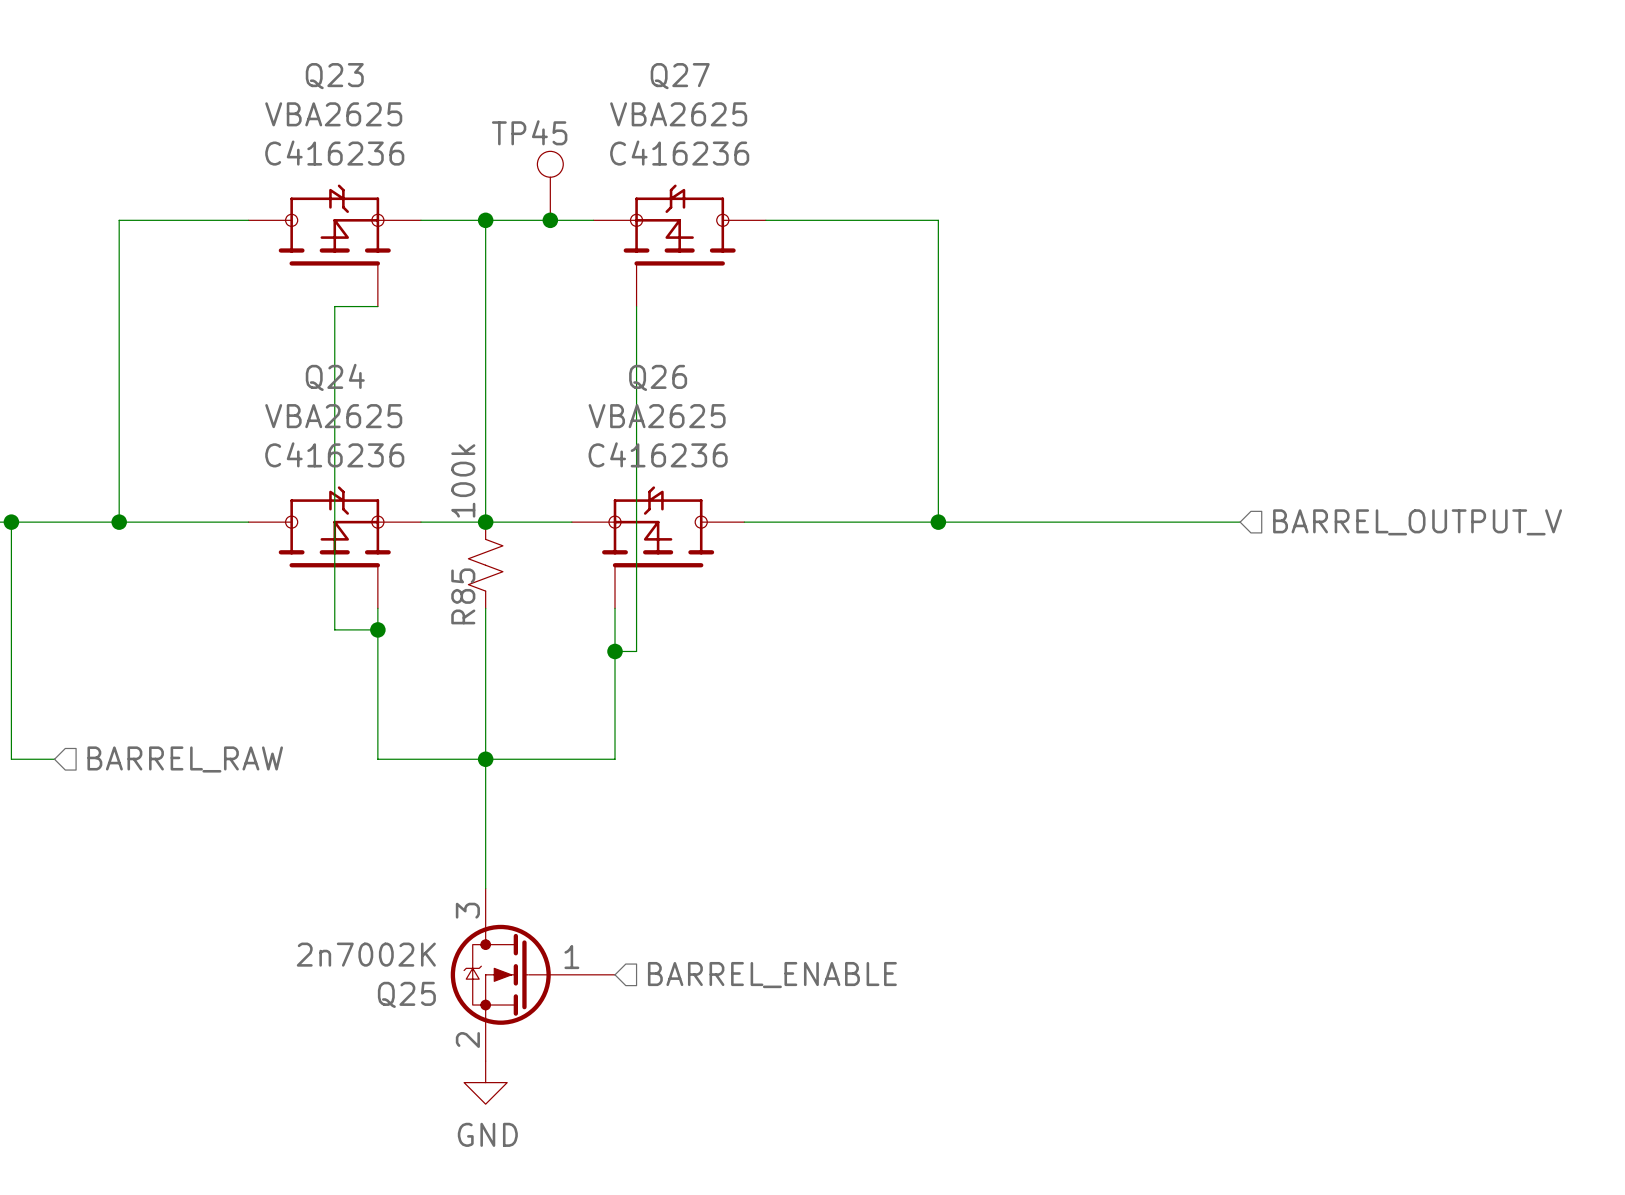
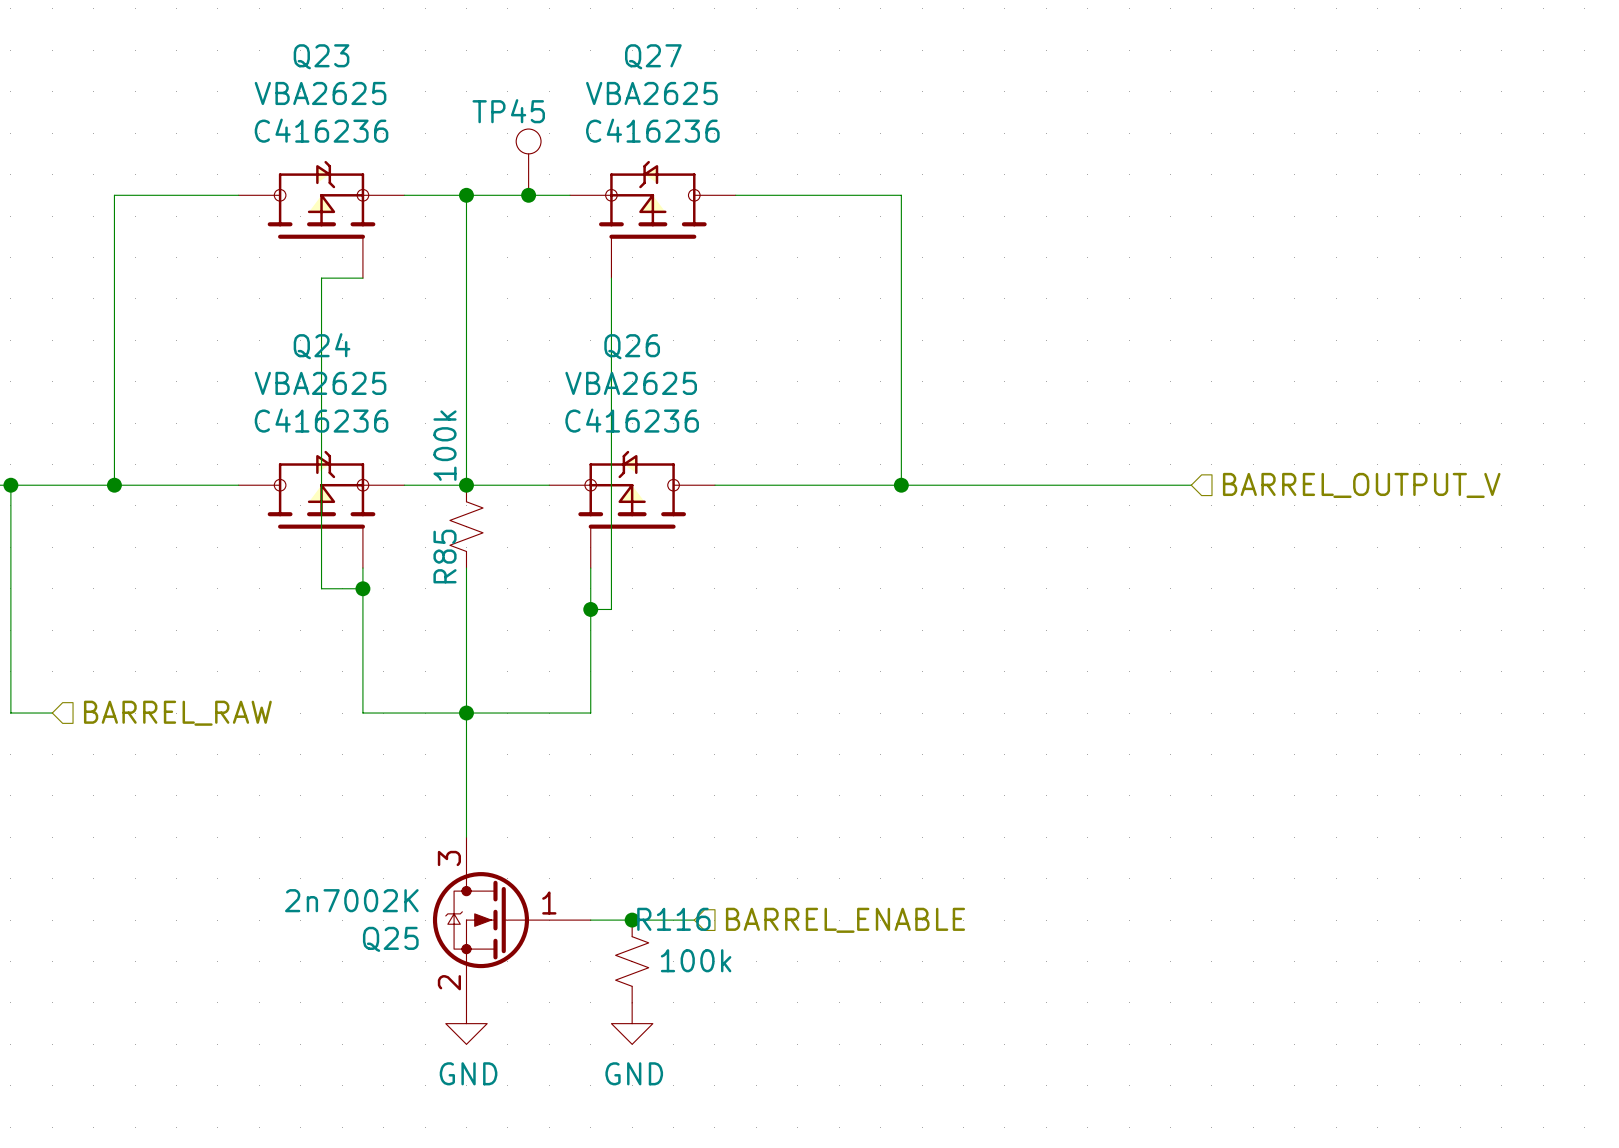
wire: none -> (590, 920) (694, 920)
junction: none -> (632, 920)
hierarchical label position: BARREL_ENABLE (772, 975) -> BARREL_ENABLE (845, 920)
R116: none -> 100k (632, 961)
power symbol: none -> GND (632, 1023)

